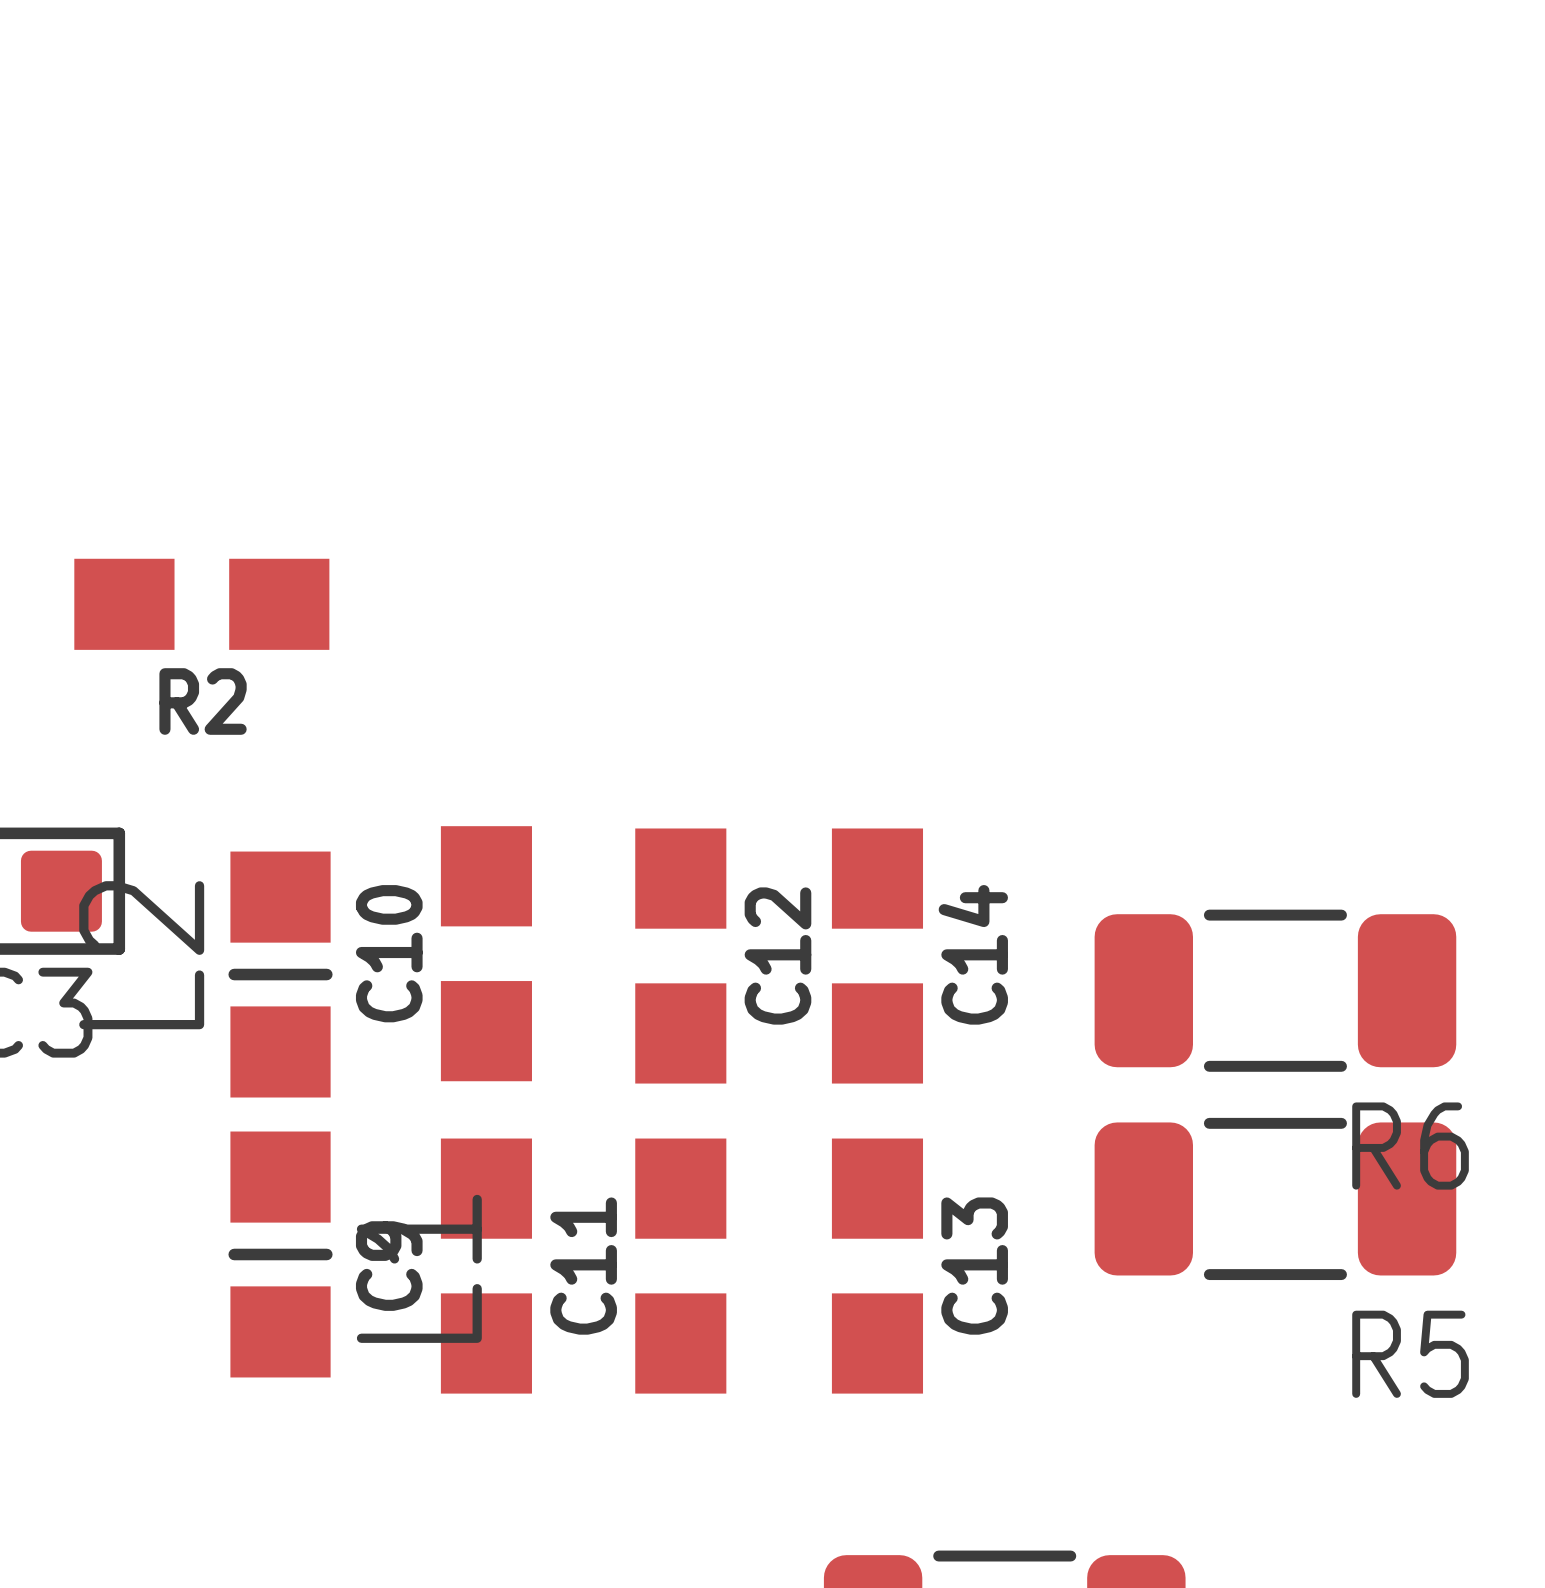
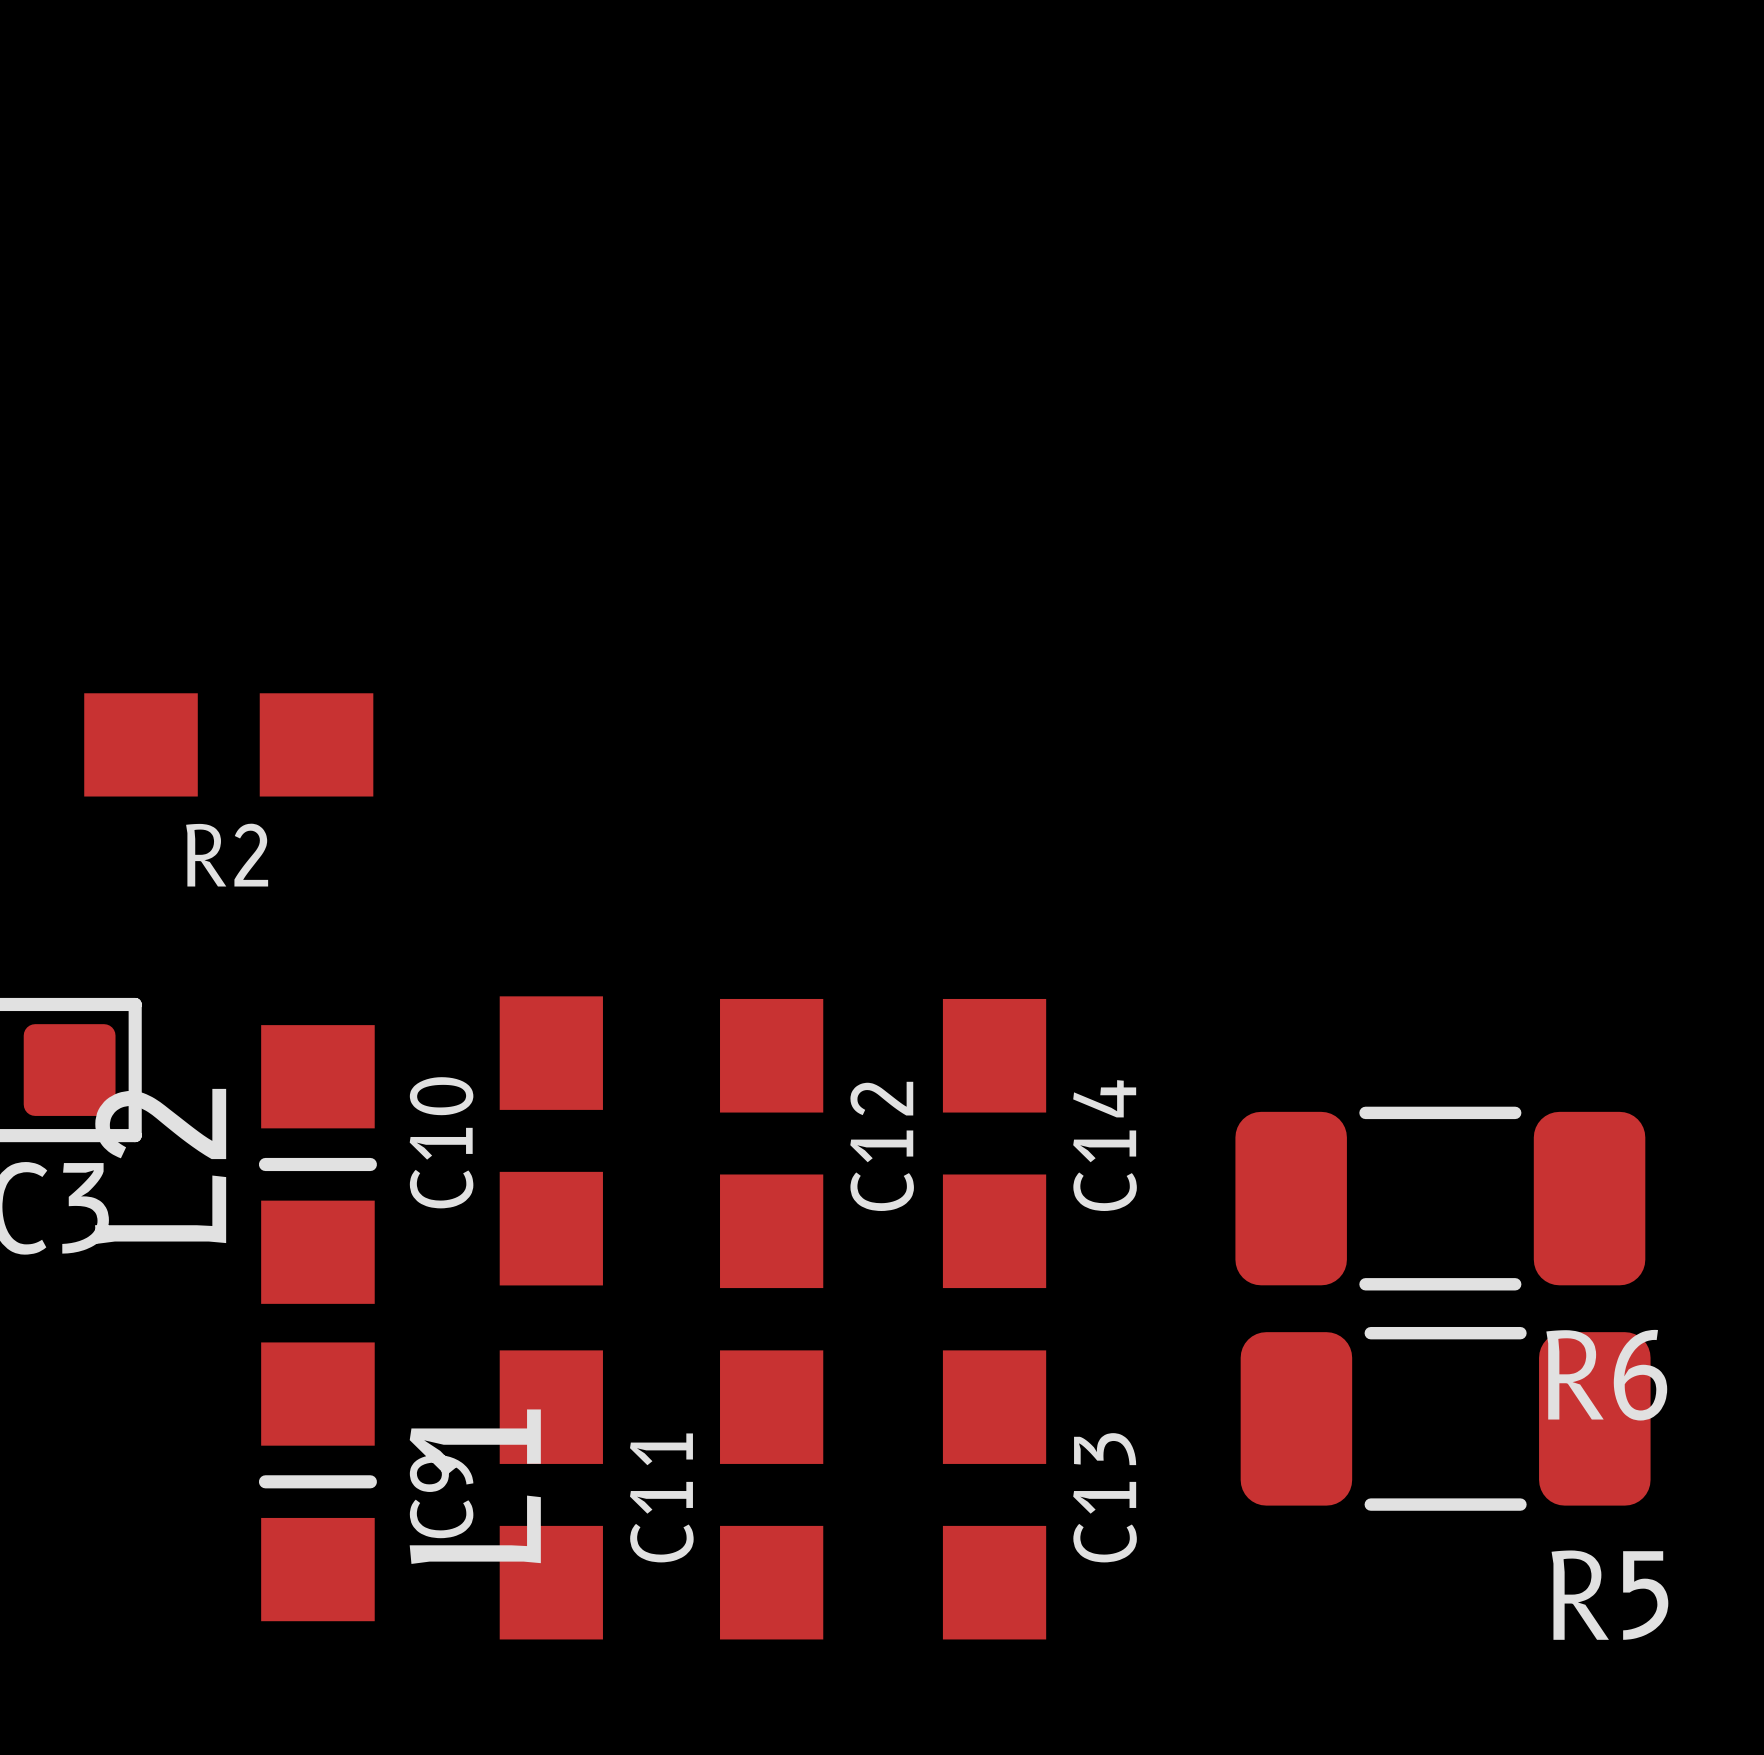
R6 position: (1275, 990) -> (1440, 1198)

